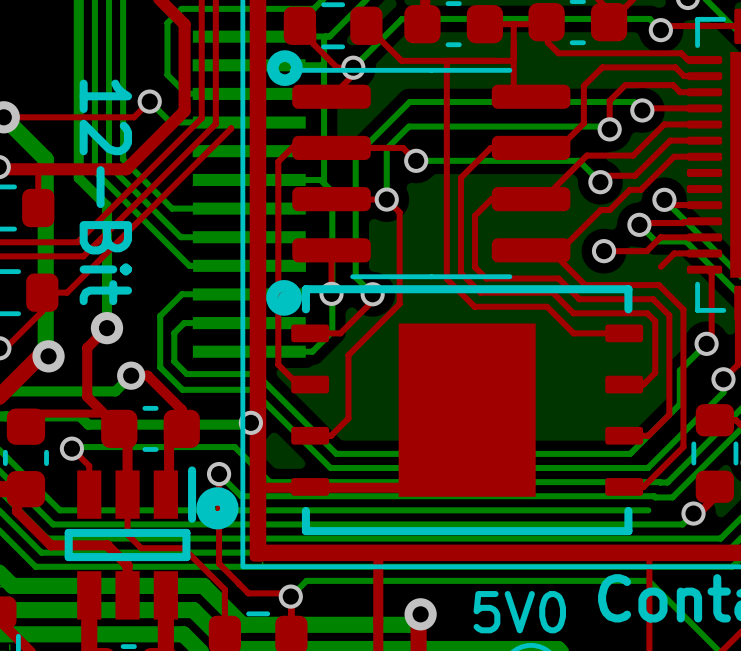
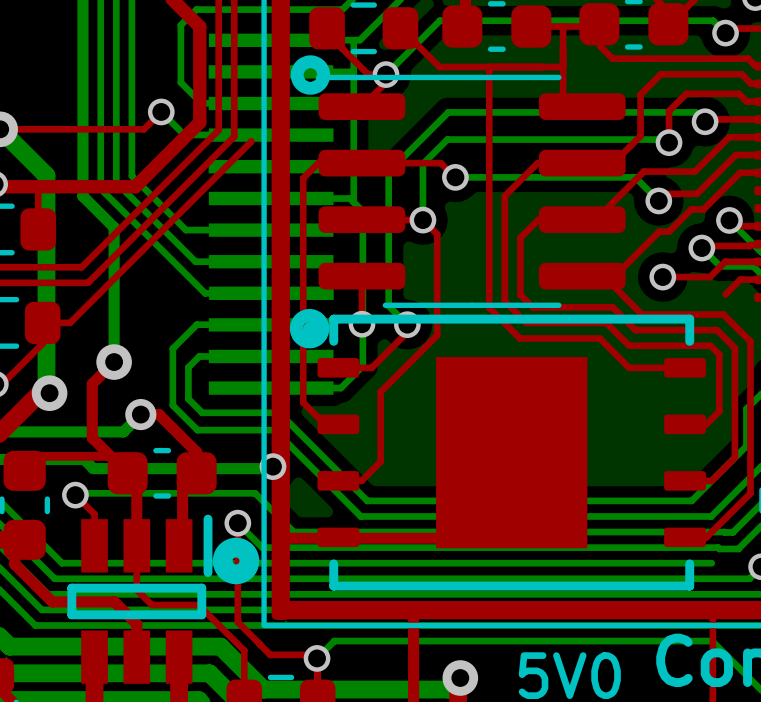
text: 12-Bit (105, 192) -> none

